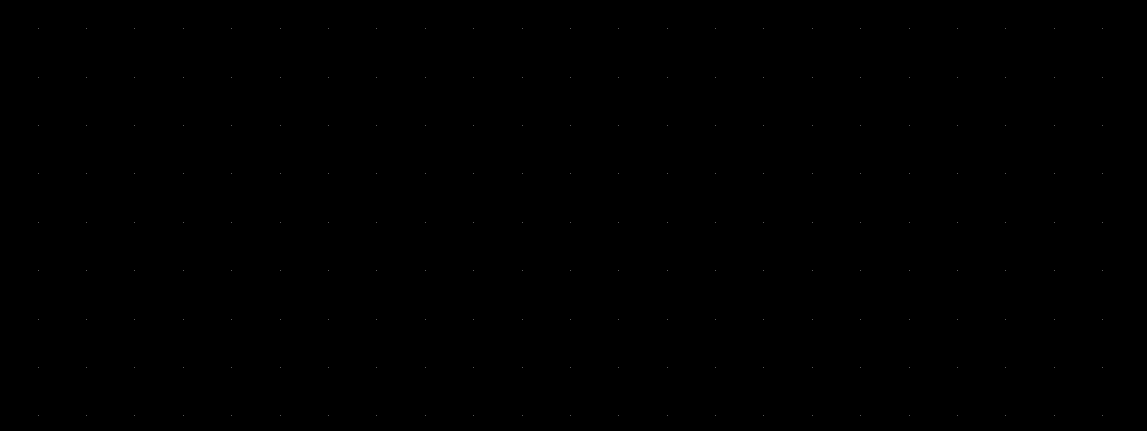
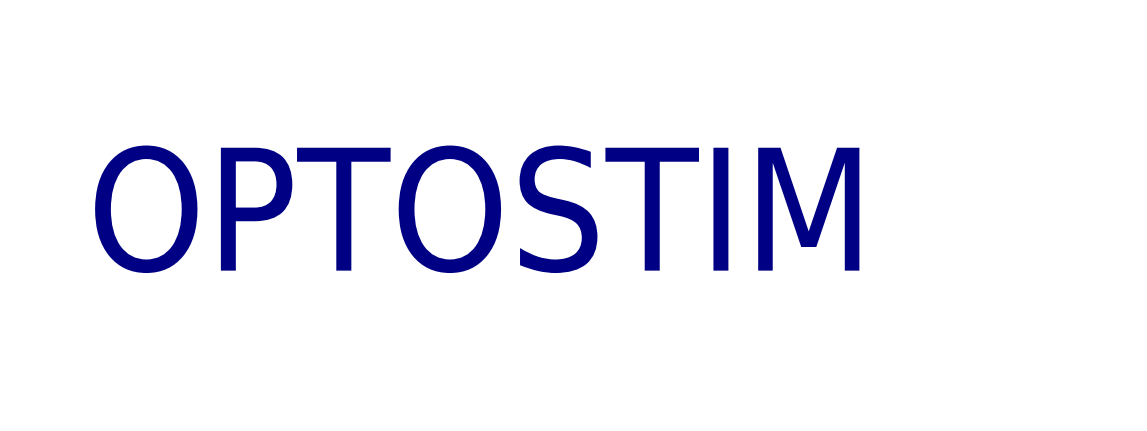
text: none -> OPTOSTIM (477, 209)

